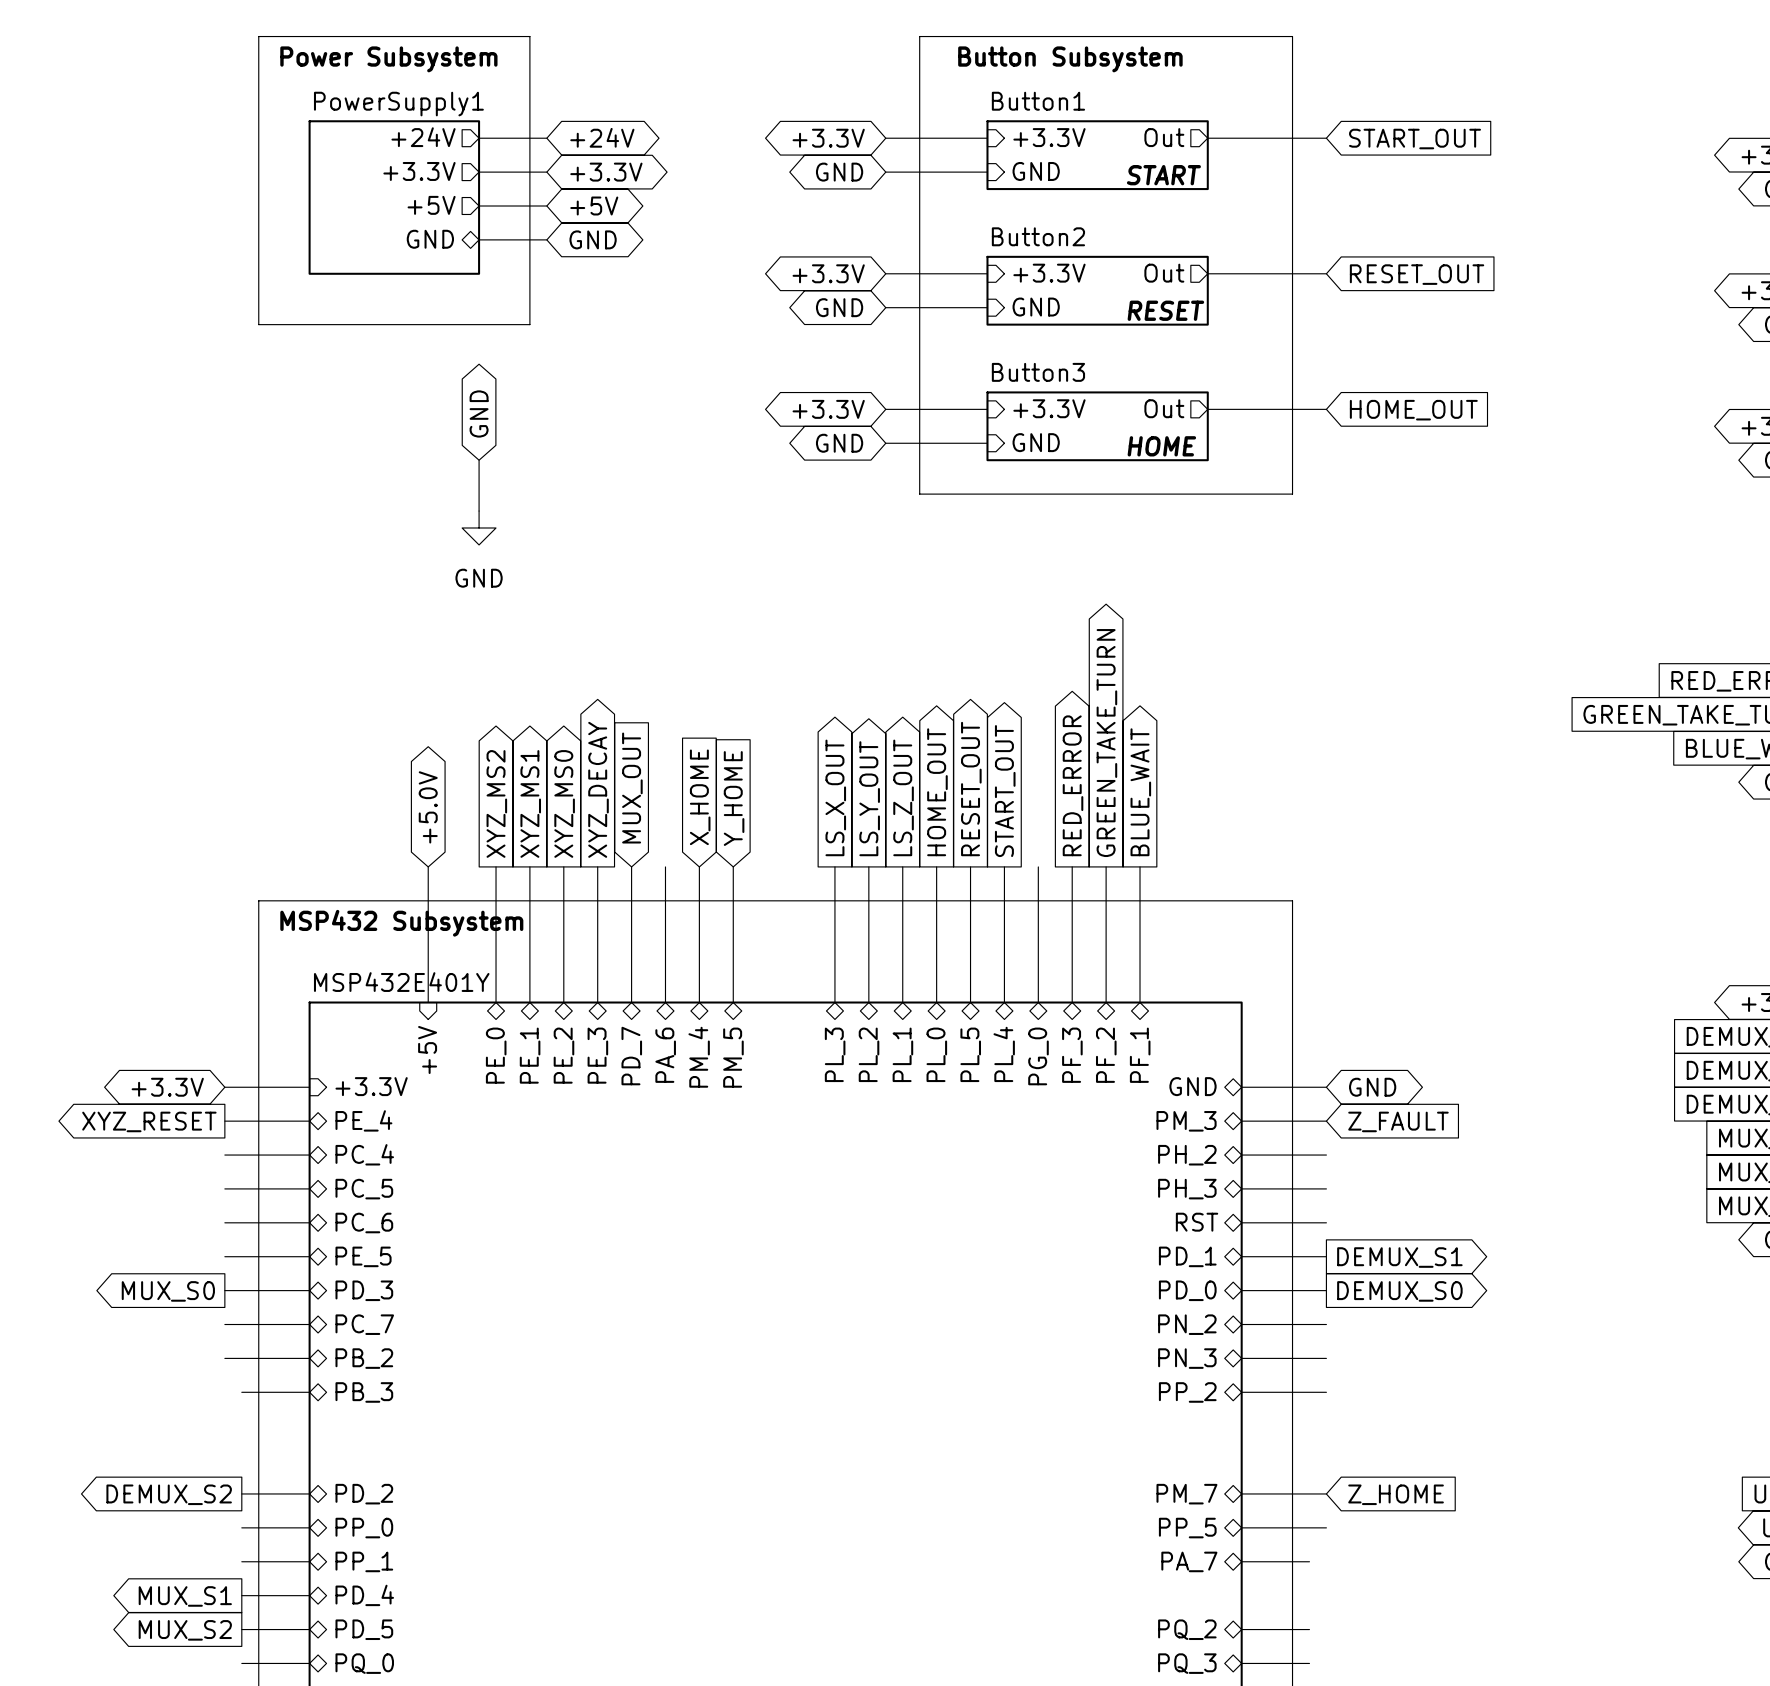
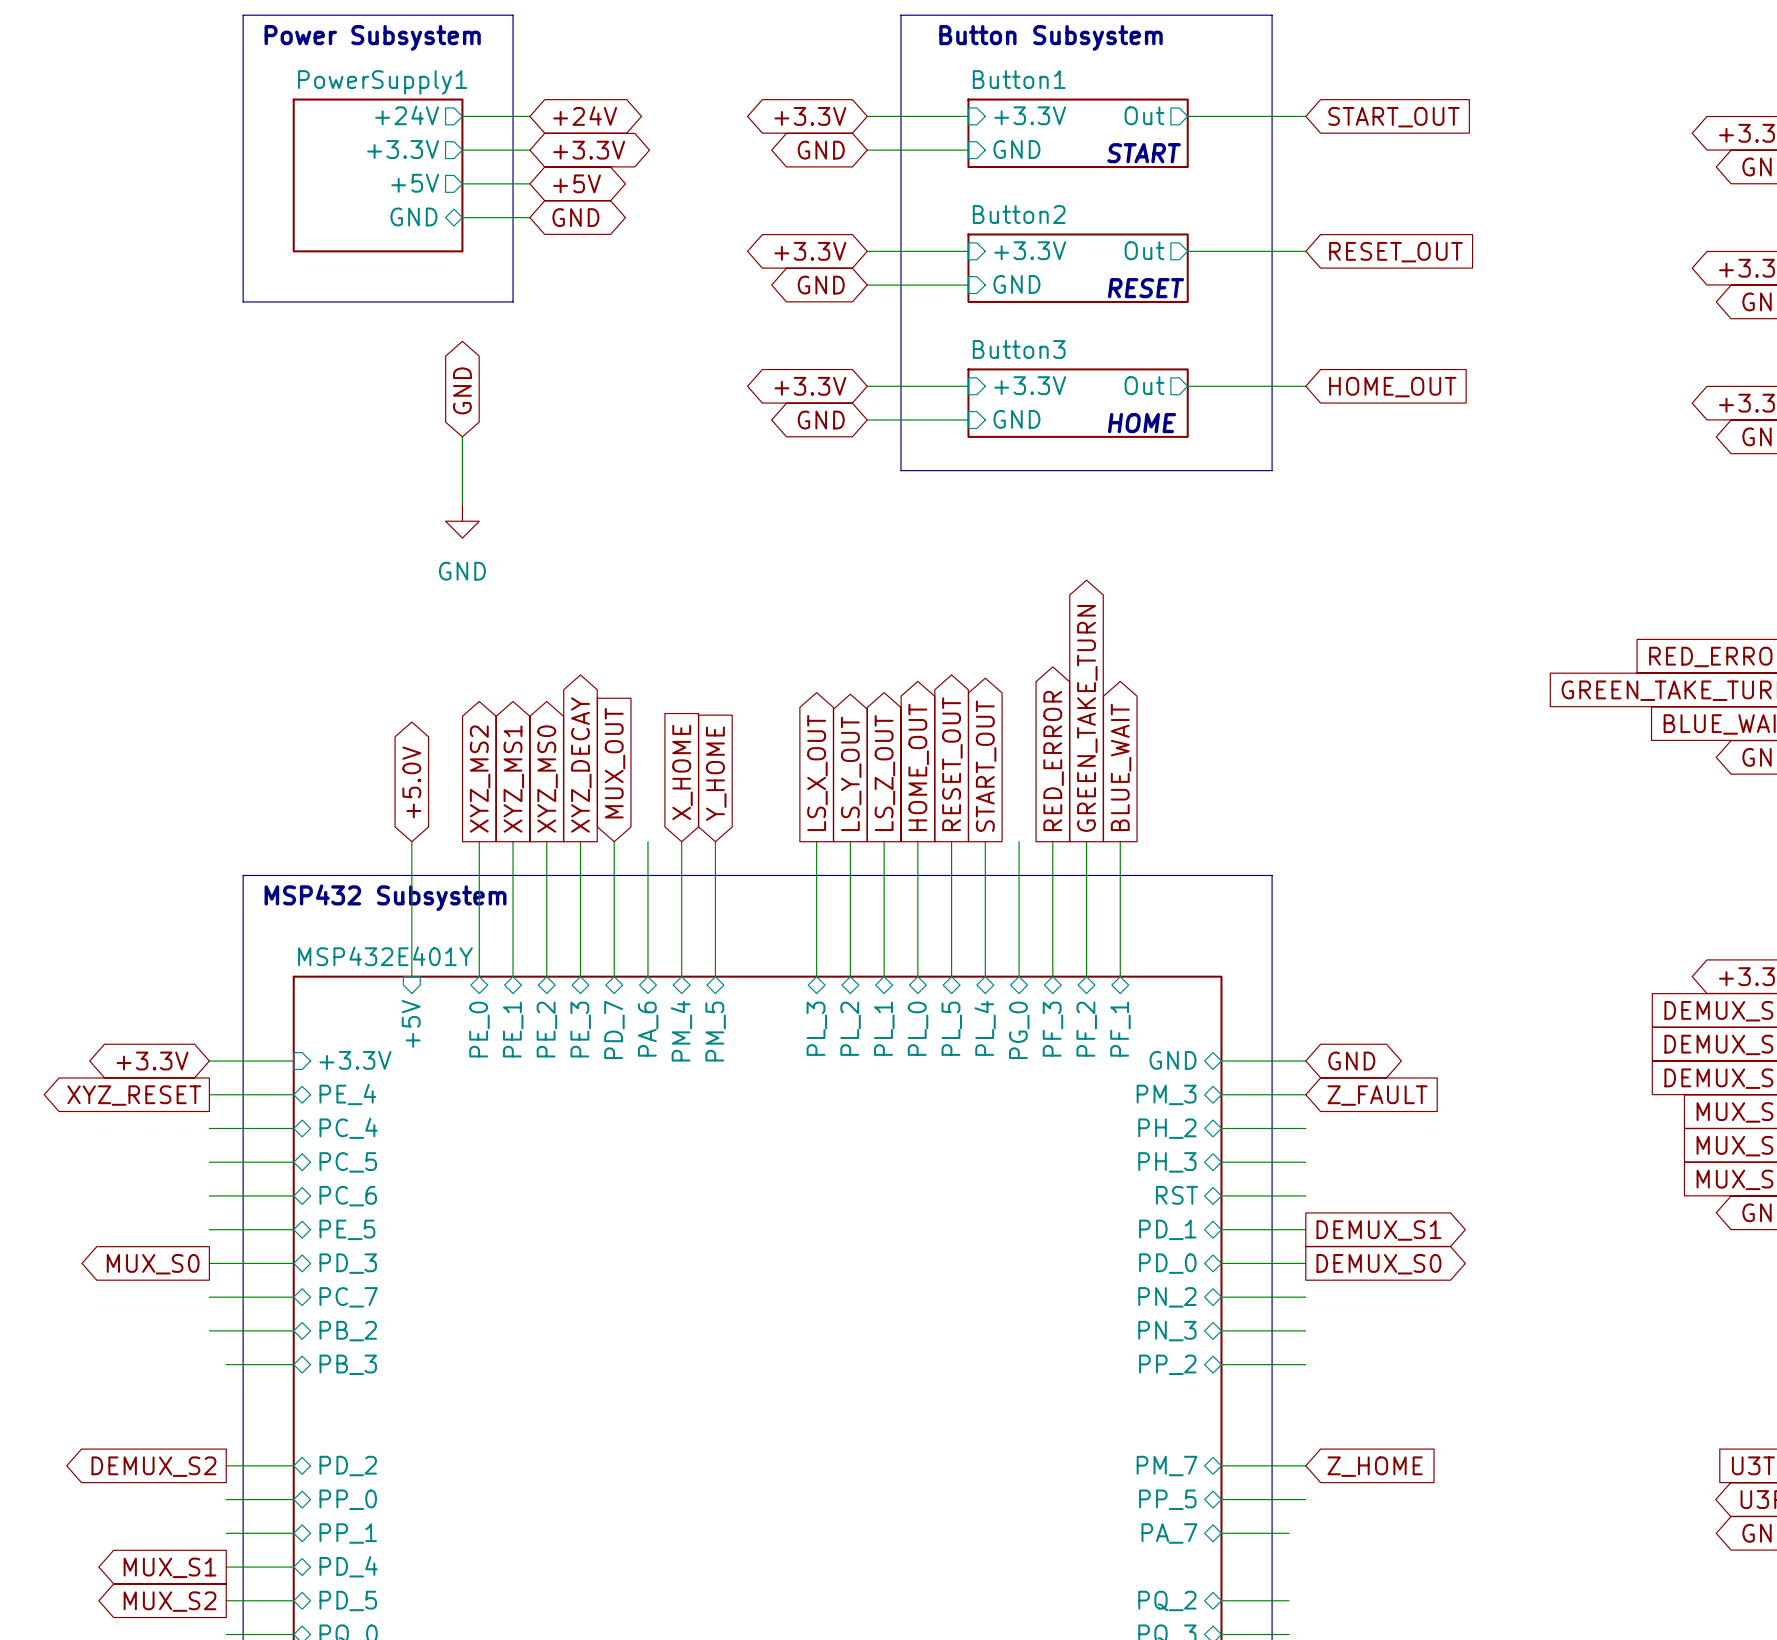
power symbol position: GND (479, 527) -> GND (462, 521)

